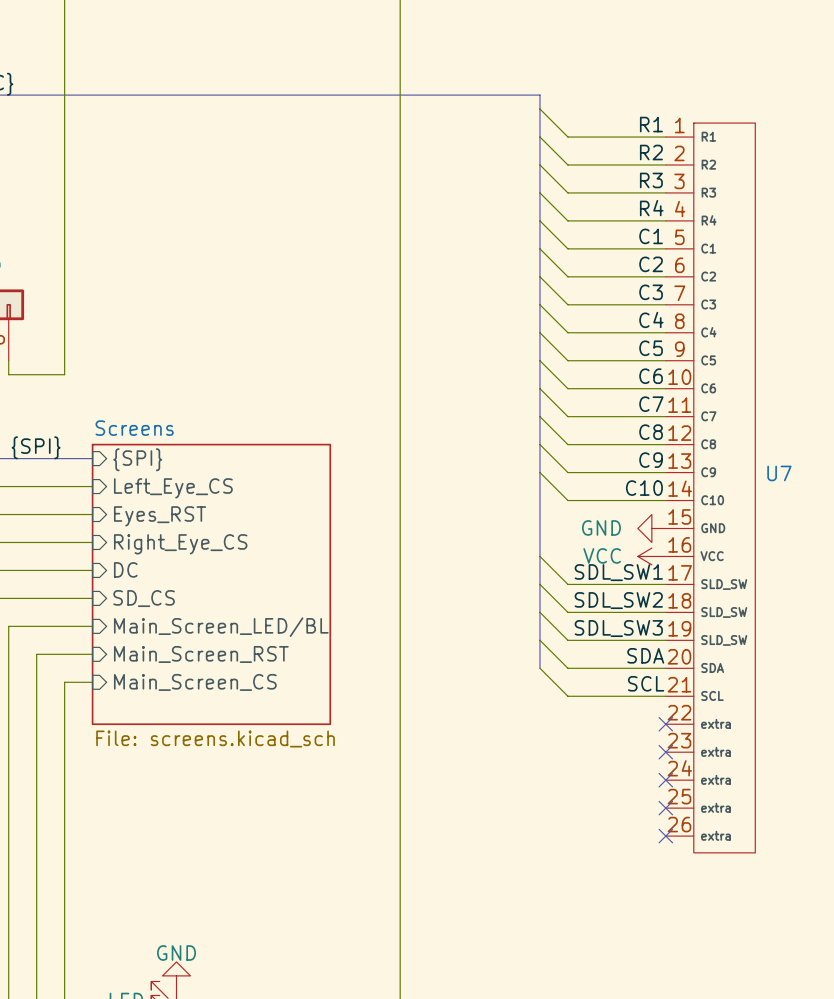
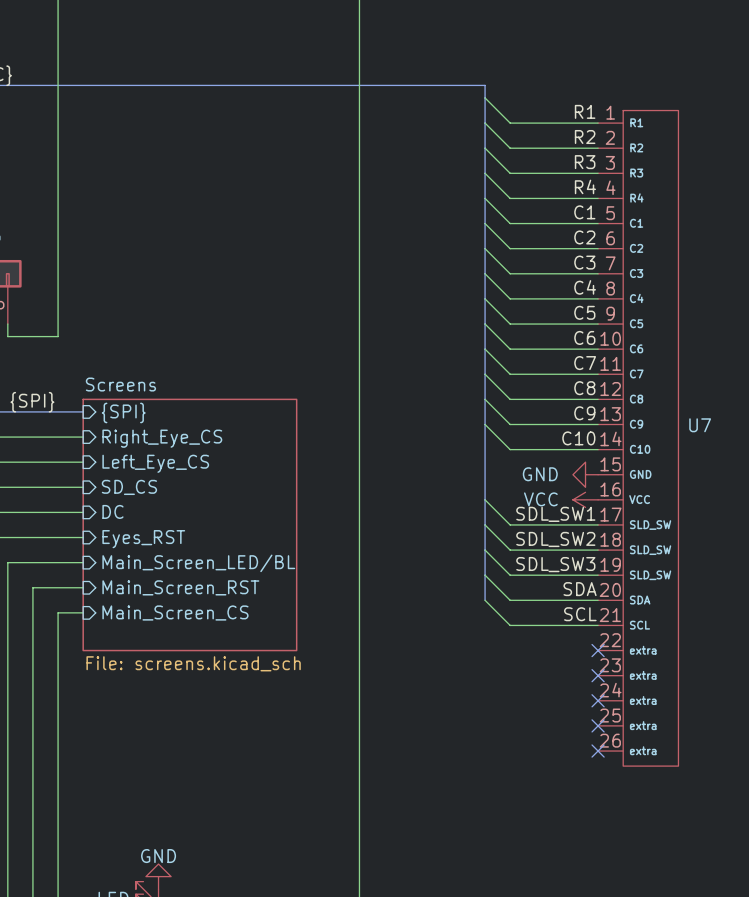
sheet pin: Left_Eye_CS (173, 488) -> Right_Eye_CS (162, 438)
sheet pin: Eyes_RST (160, 516) -> Left_Eye_CS (155, 463)
sheet pin: Right_Eye_CS (180, 544) -> SD_CS (129, 487)
sheet pin: SD_CS (144, 598) -> Eyes_RST (143, 539)

